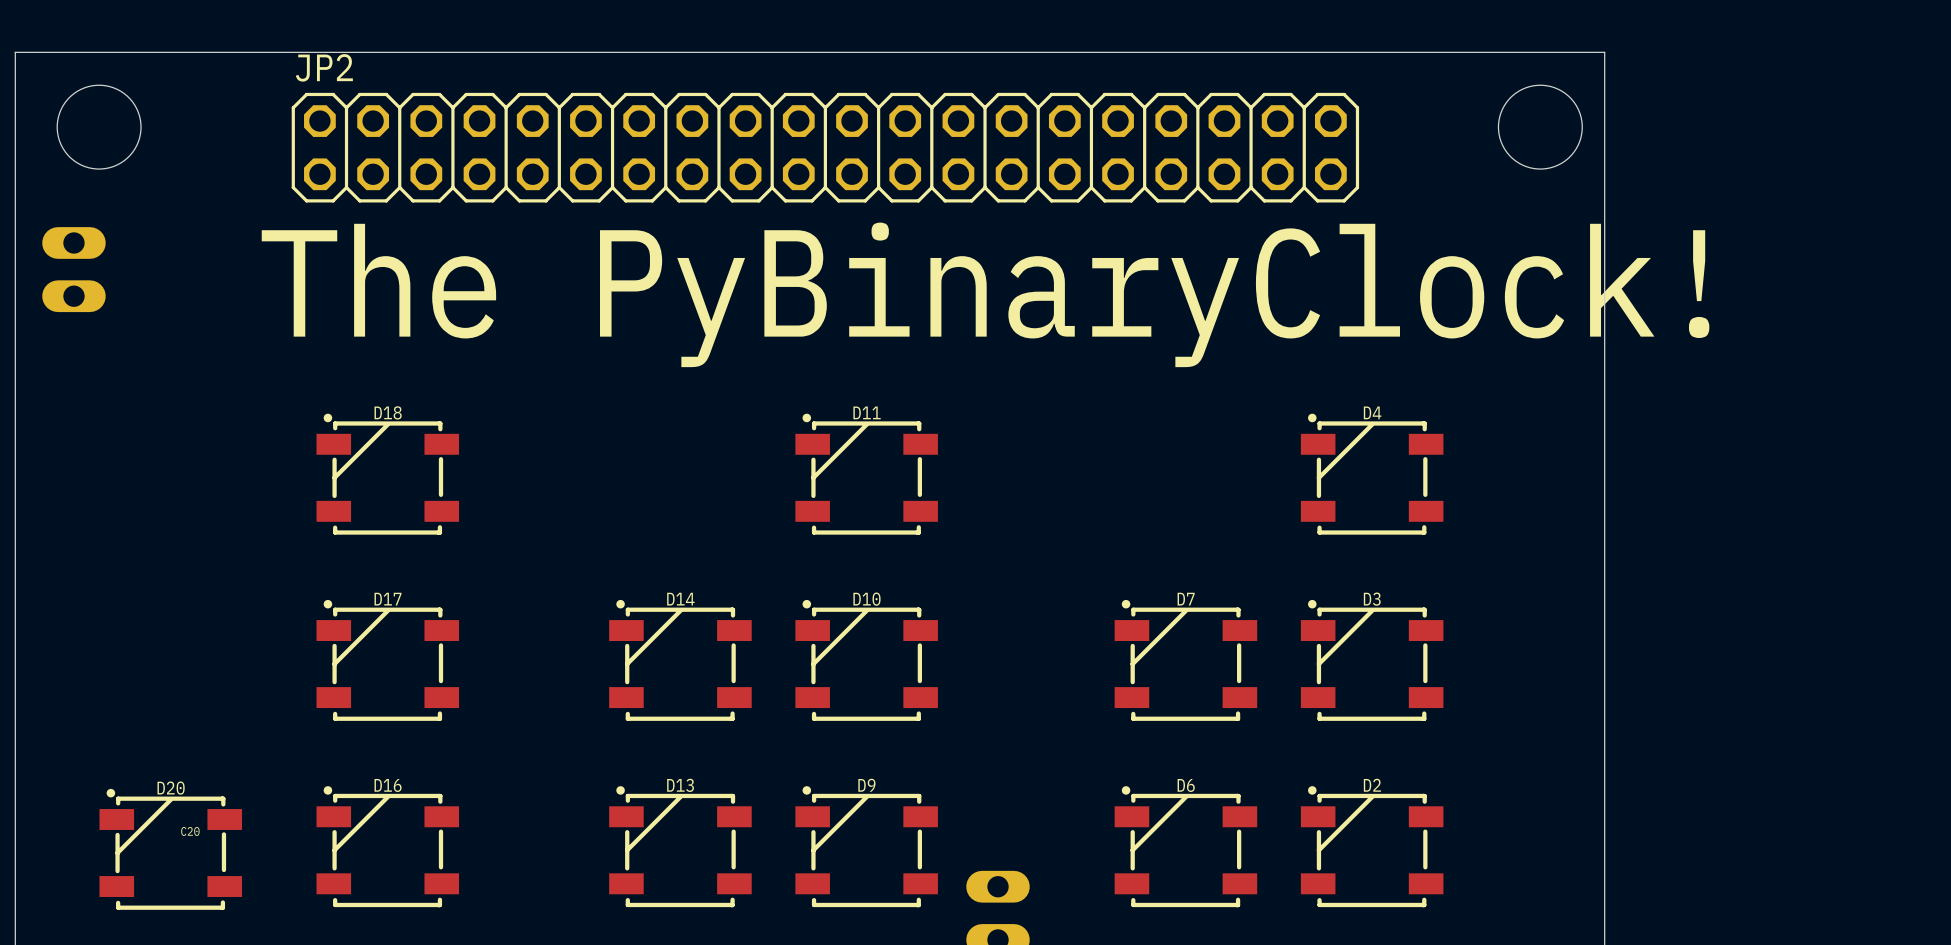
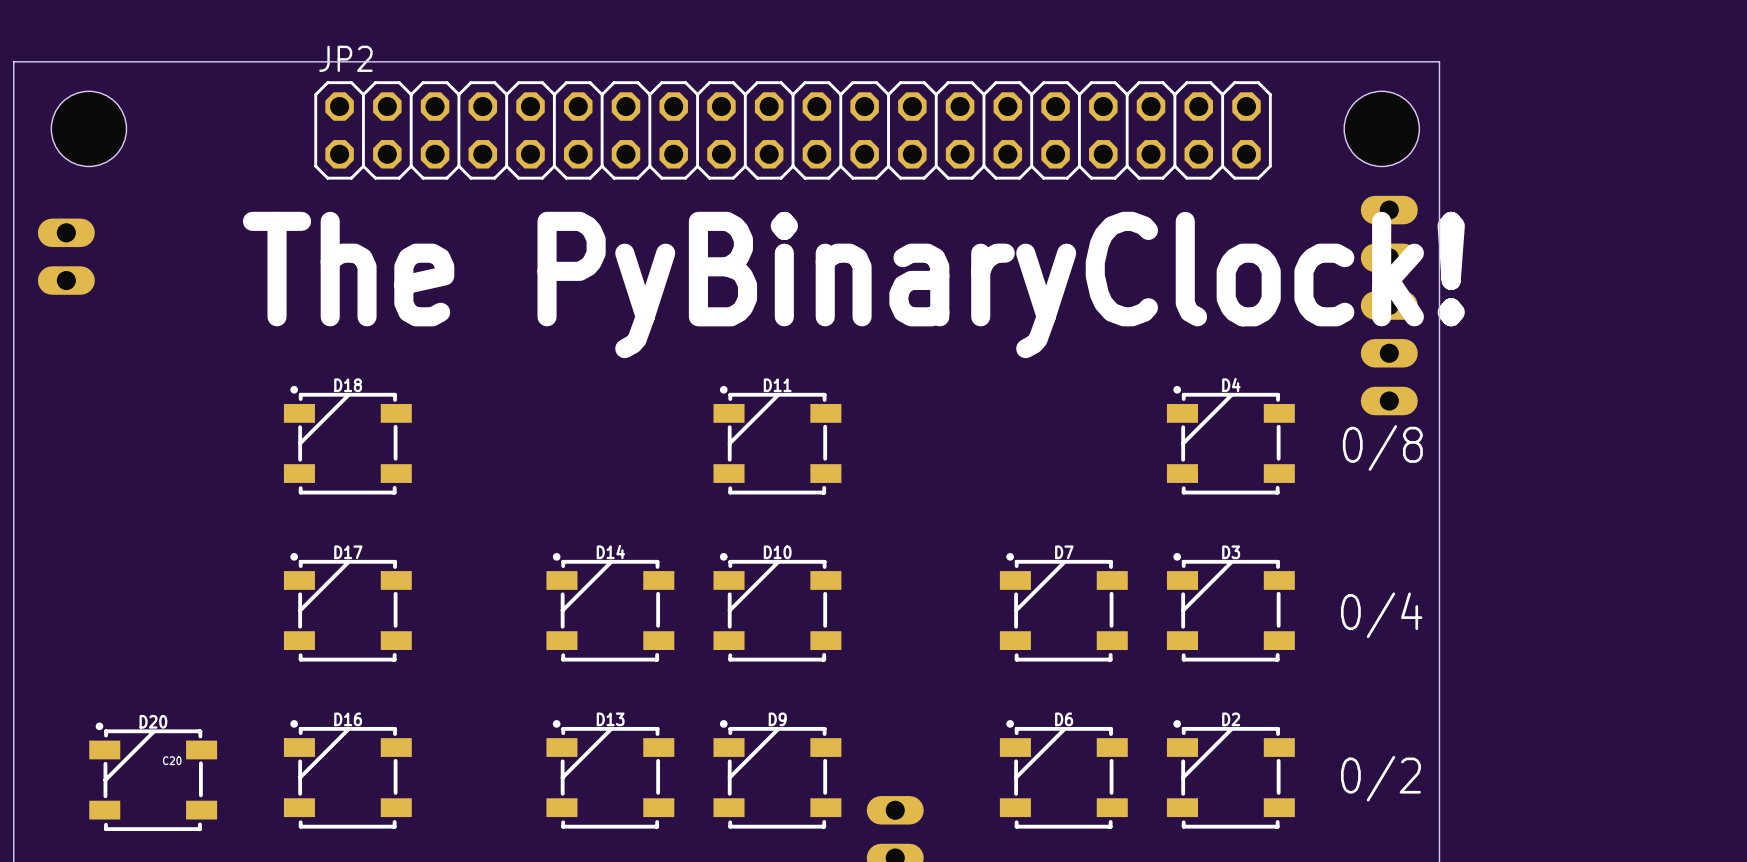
JP2 position: (825, 147) -> (793, 130)
part: none -> (1389, 305)
text: none -> 0/8 (1382, 447)
text: none -> 0/4 (1381, 615)
text: none -> 0/2 (1380, 778)

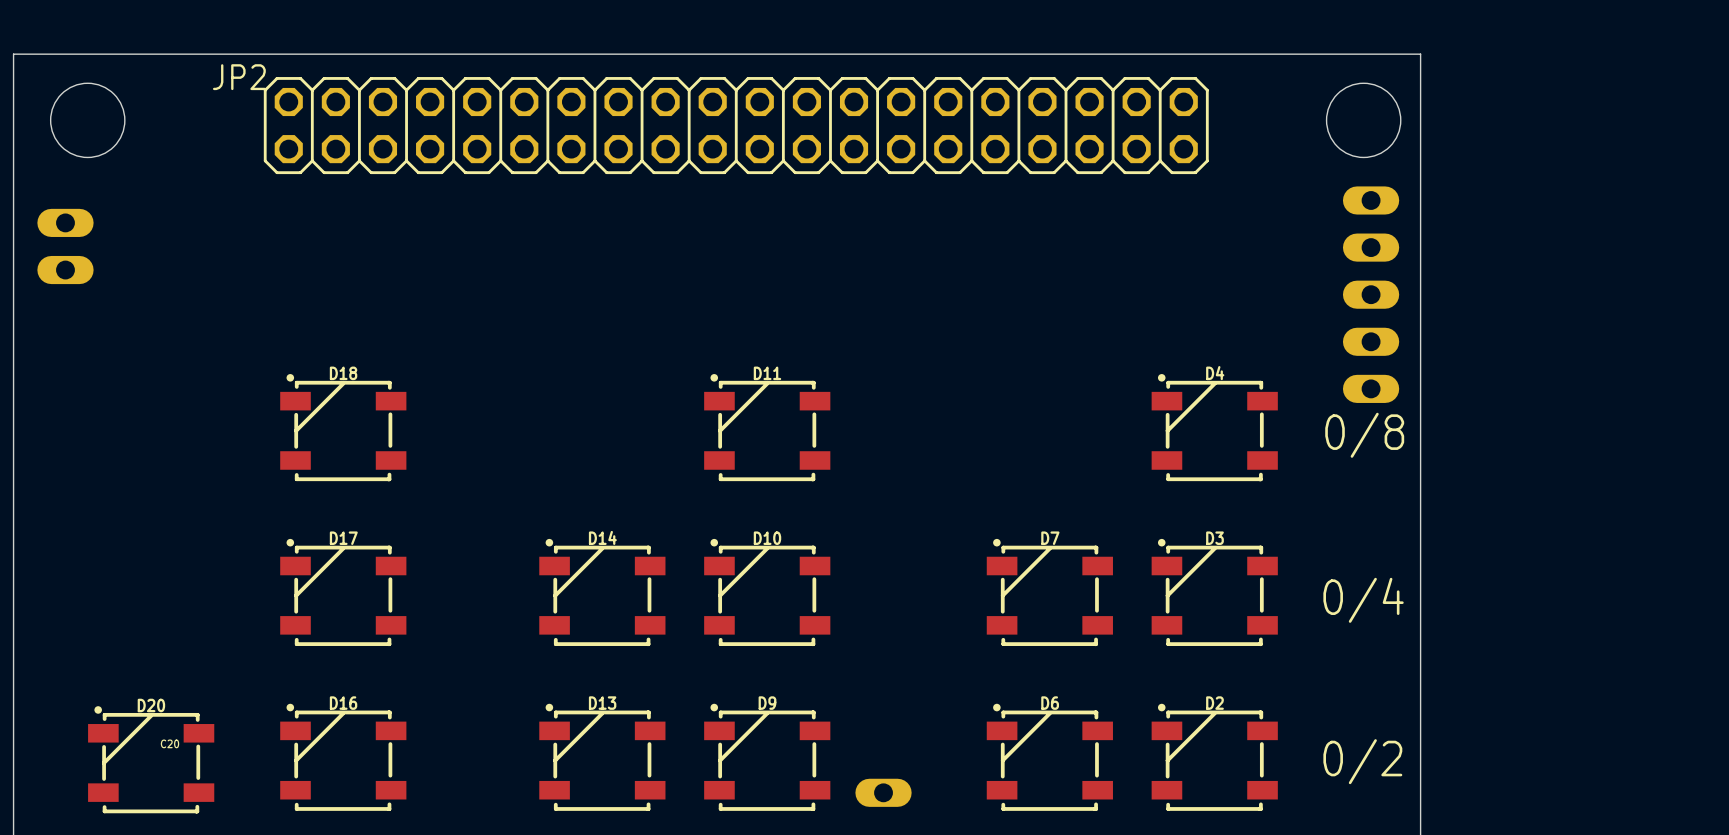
JP2 name position: JP2 (345, 58) -> JP2 (239, 77)
JP2 position: (793, 130) -> (736, 125)
text: The PyBinaryClock! (853, 285) -> none

